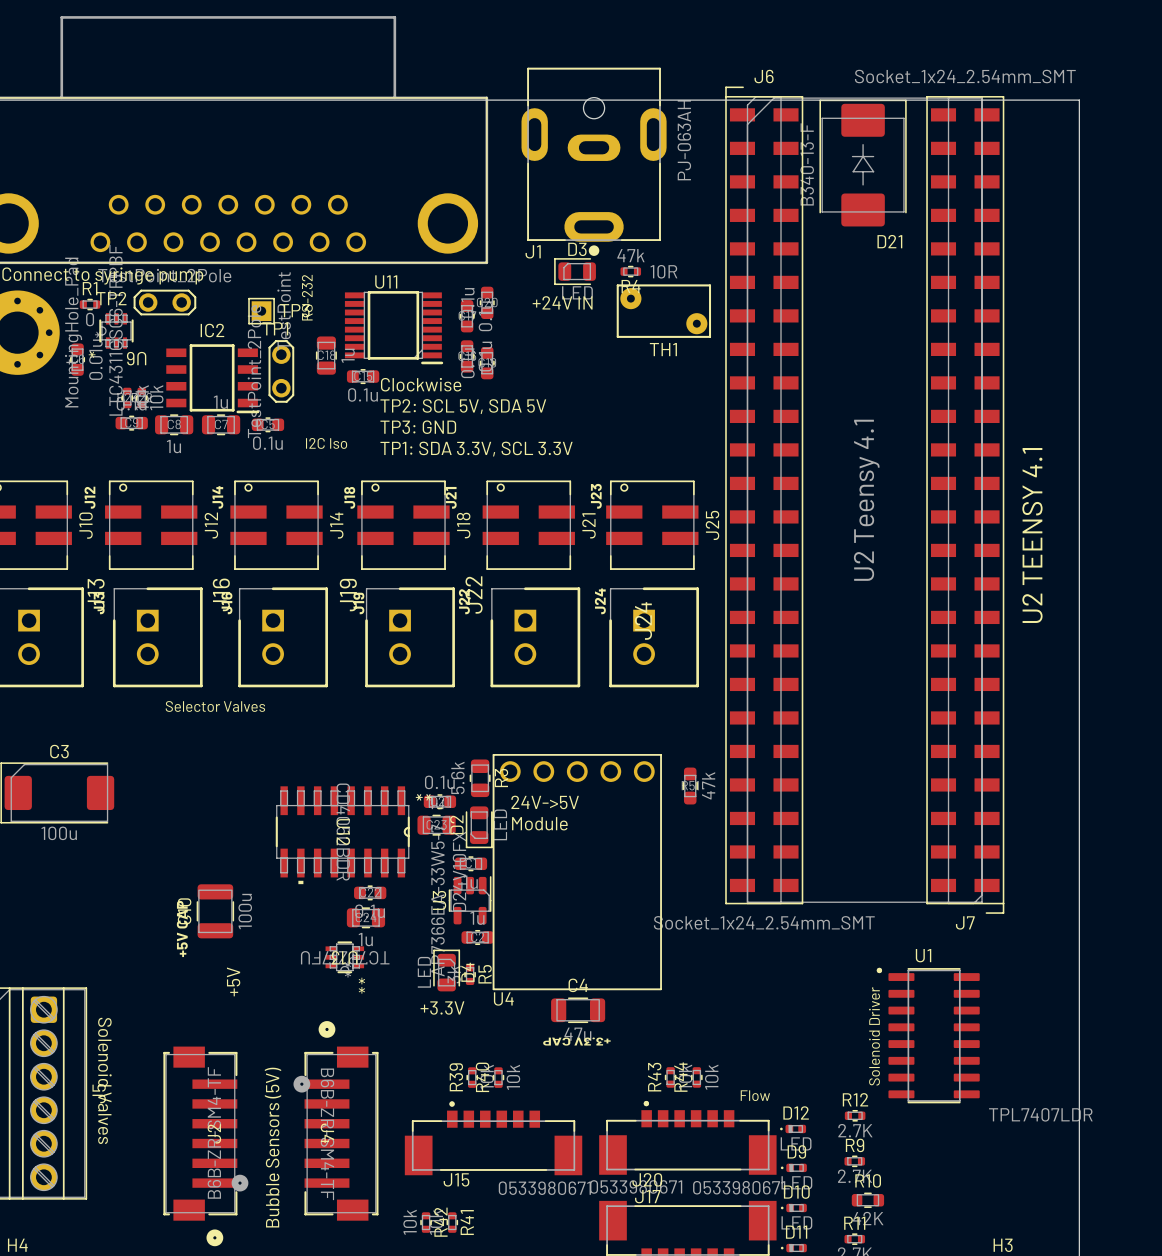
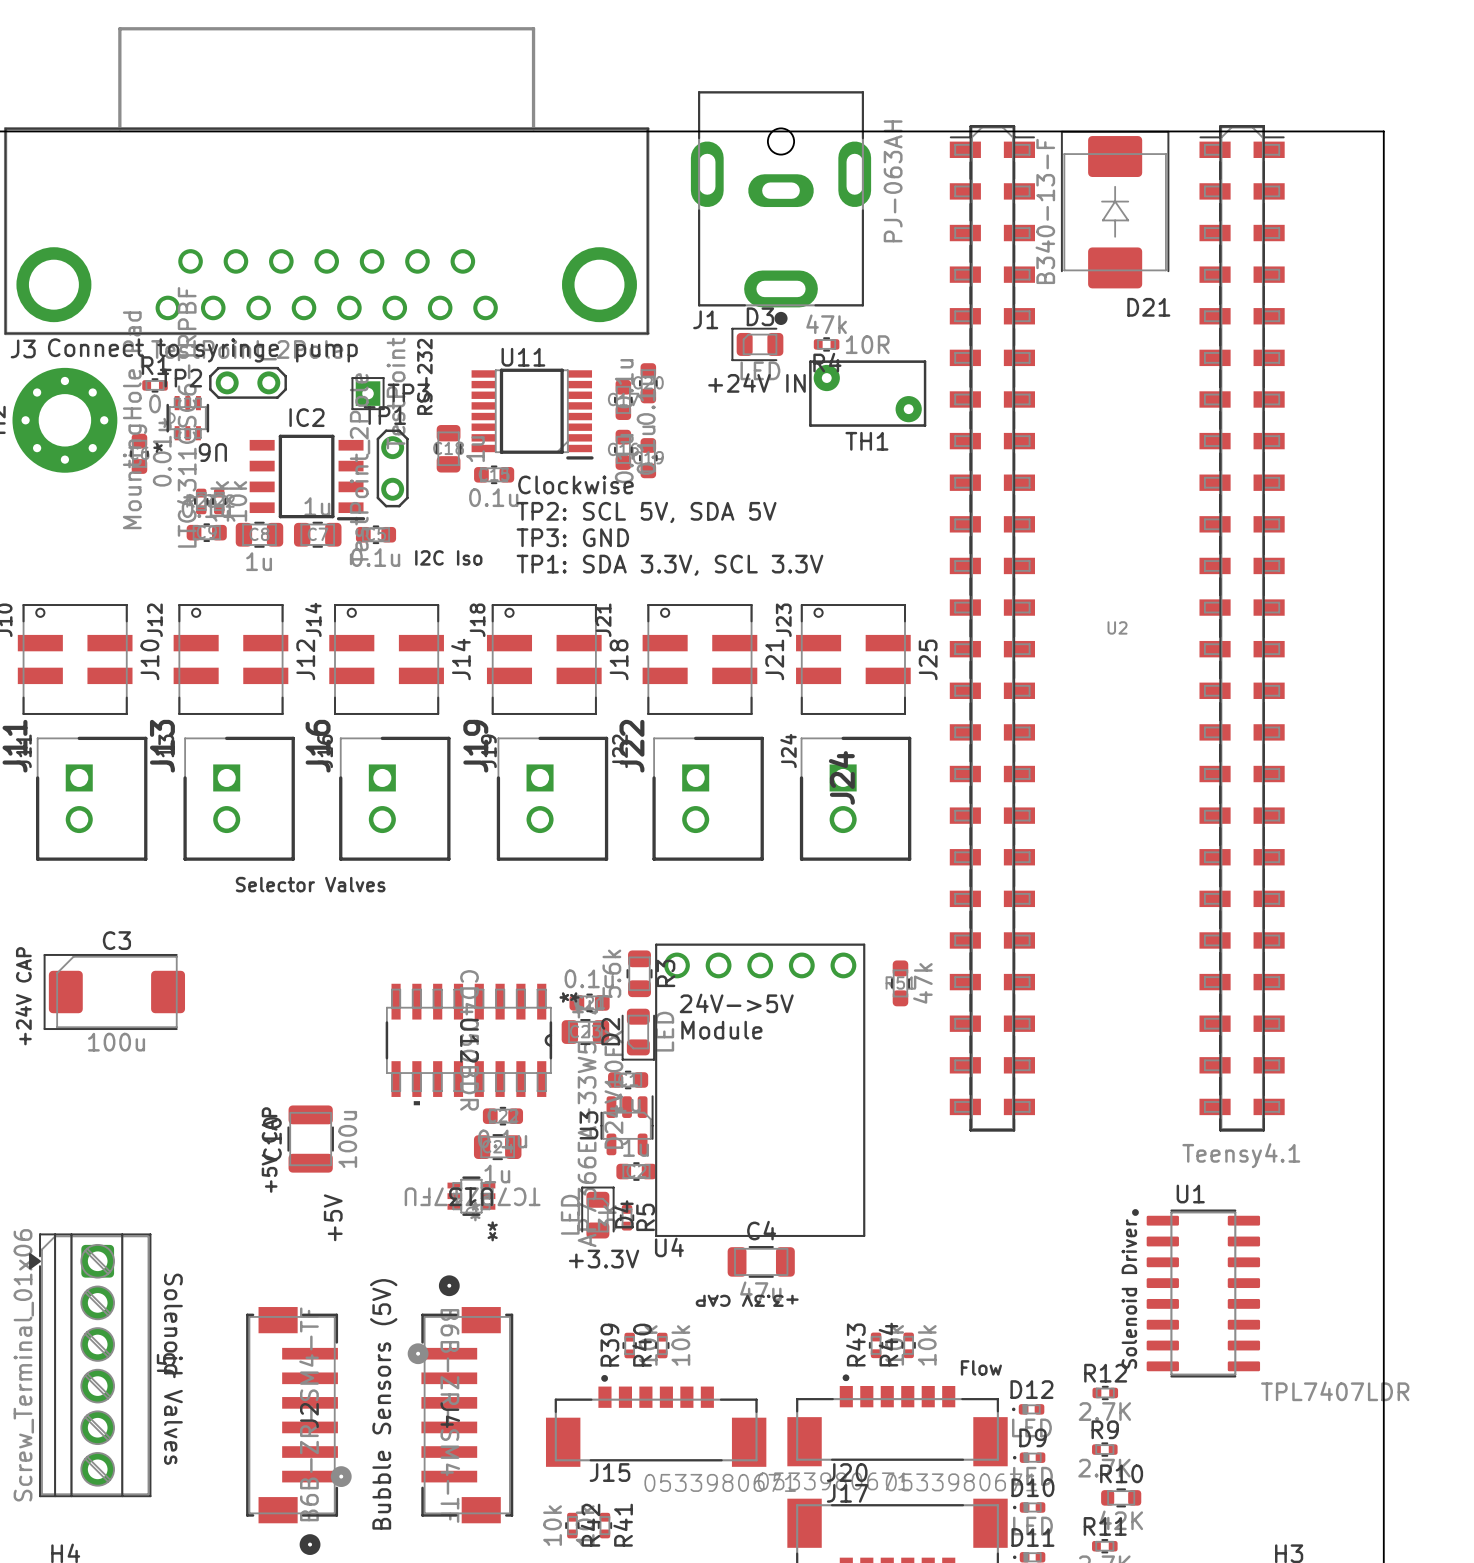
line: (773, 98) (747, 124) (747, 902) (982, 902) (982, 98) (773, 98) -> none
J6: Socket_1x24_2.54mm_SMT (764, 495) -> none
U2: none -> Teensy4.1 (1117, 628)
text: U2 Teensy 4.1 (866, 500) -> none
J7: Socket_1x24_2.54mm_SMT (965, 504) -> none
text: U2 TEENSY 4.1 (1032, 535) -> none

